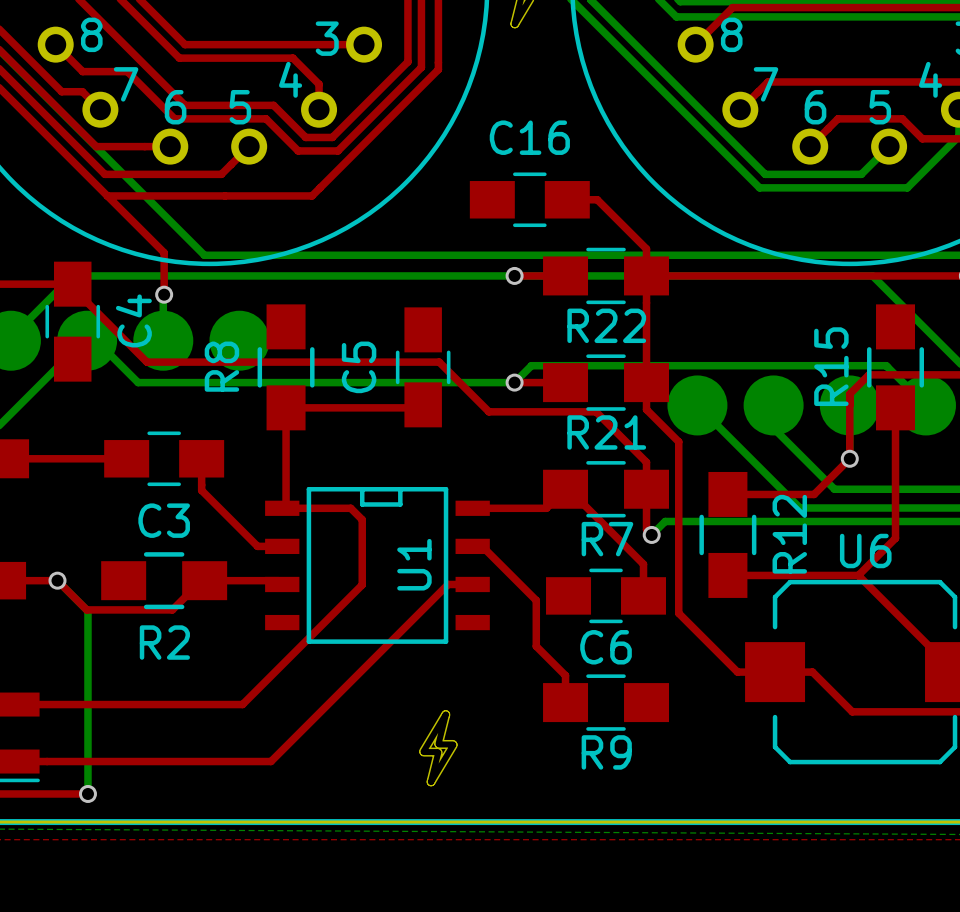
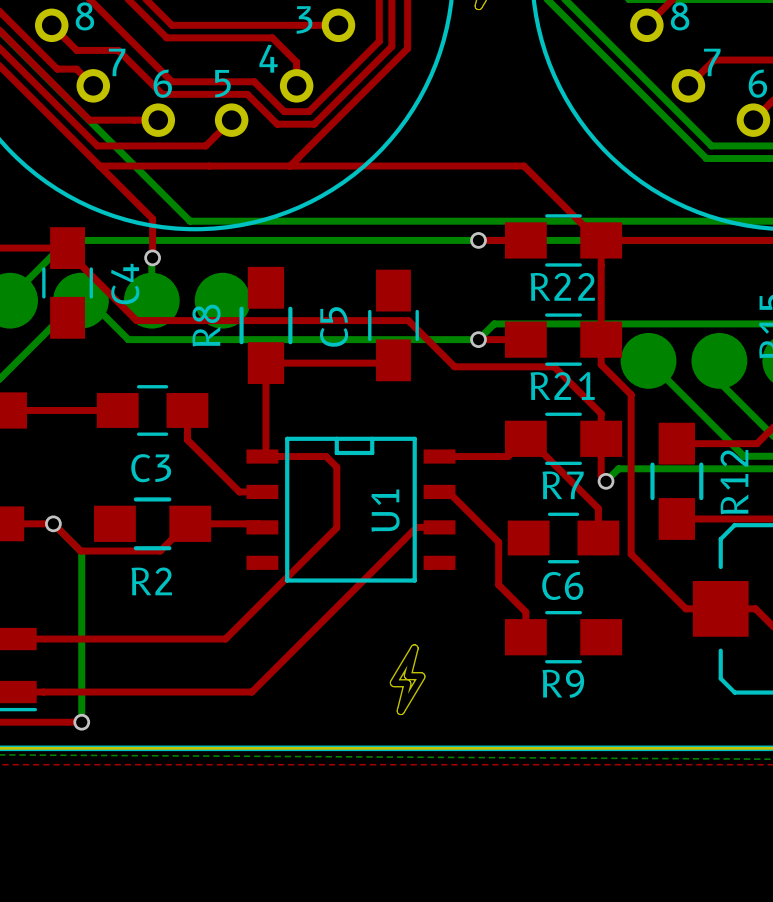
top track: none -> (290, 166) (524, 166) (598, 240)
C16: (529, 199) -> none
top track: (567, 199) (597, 199) (646, 248) (646, 270) -> none

